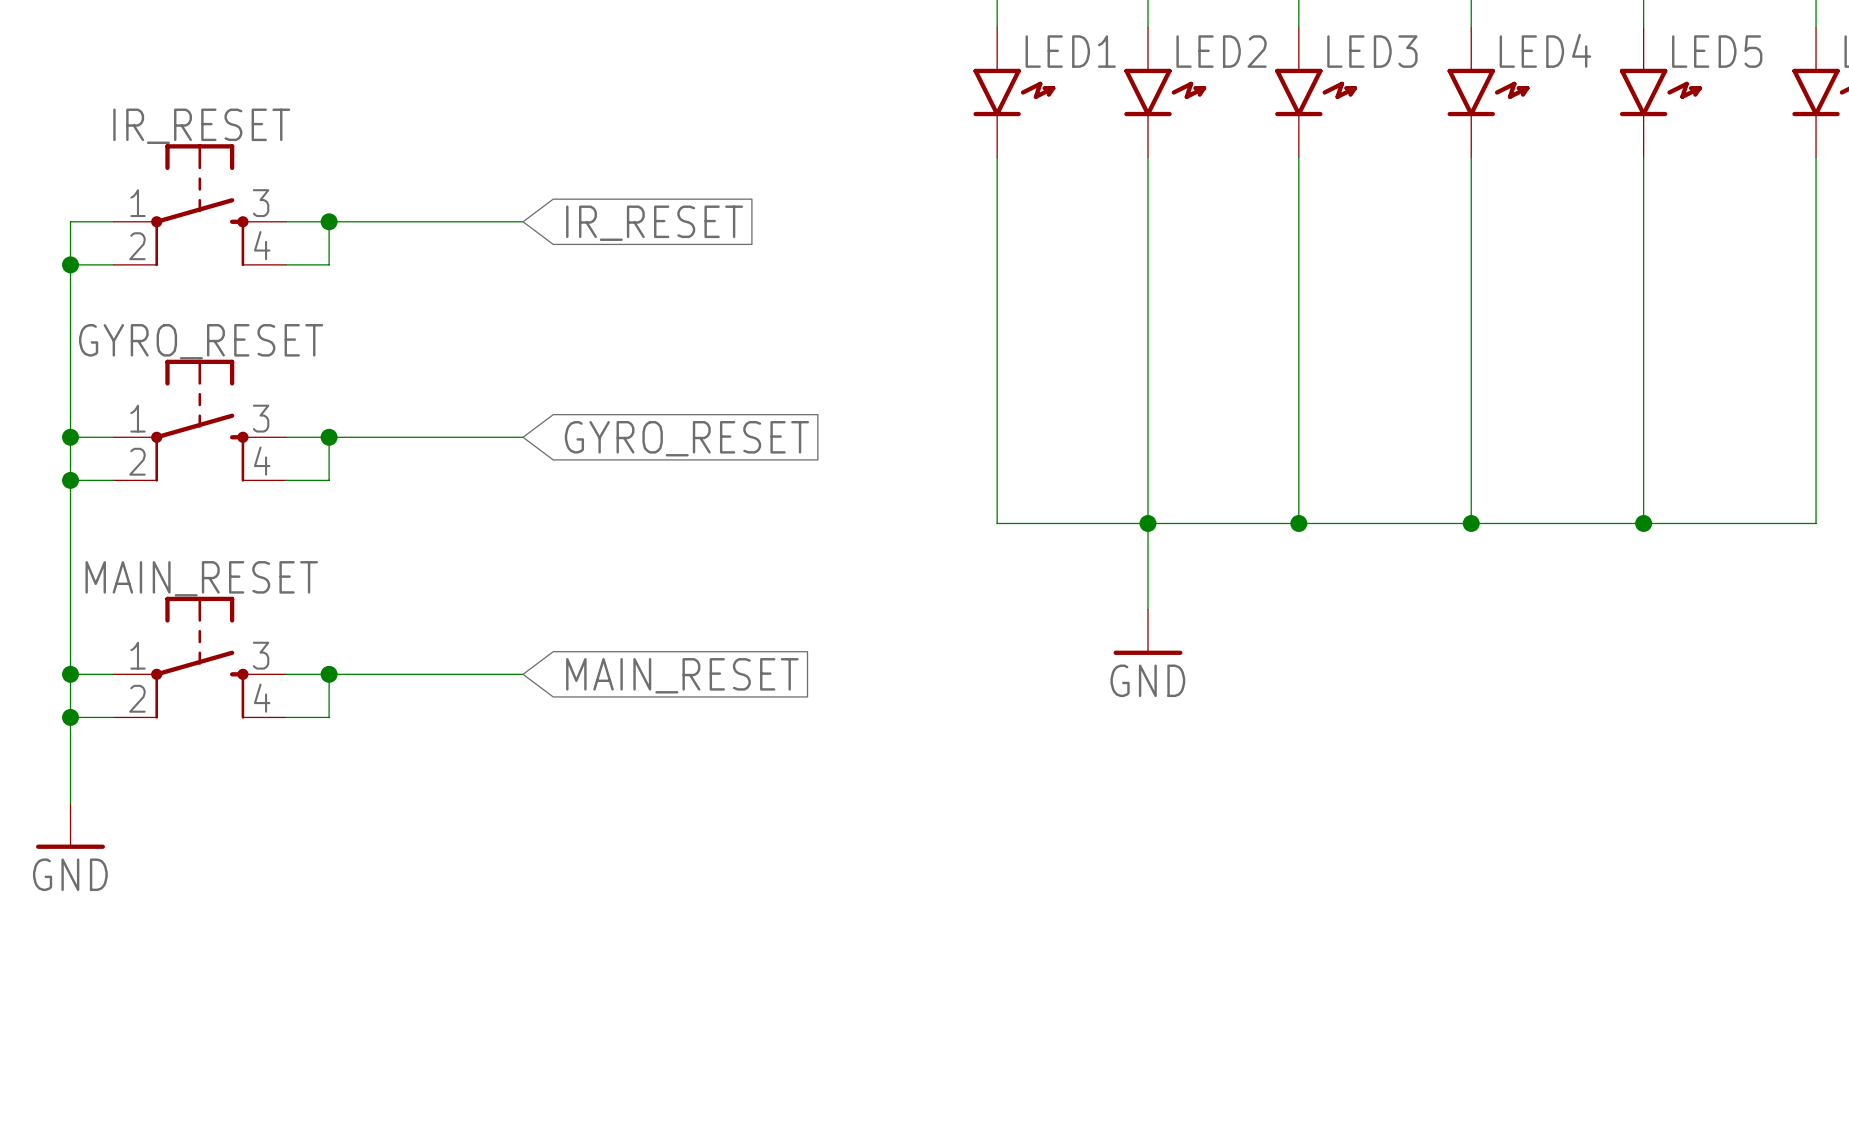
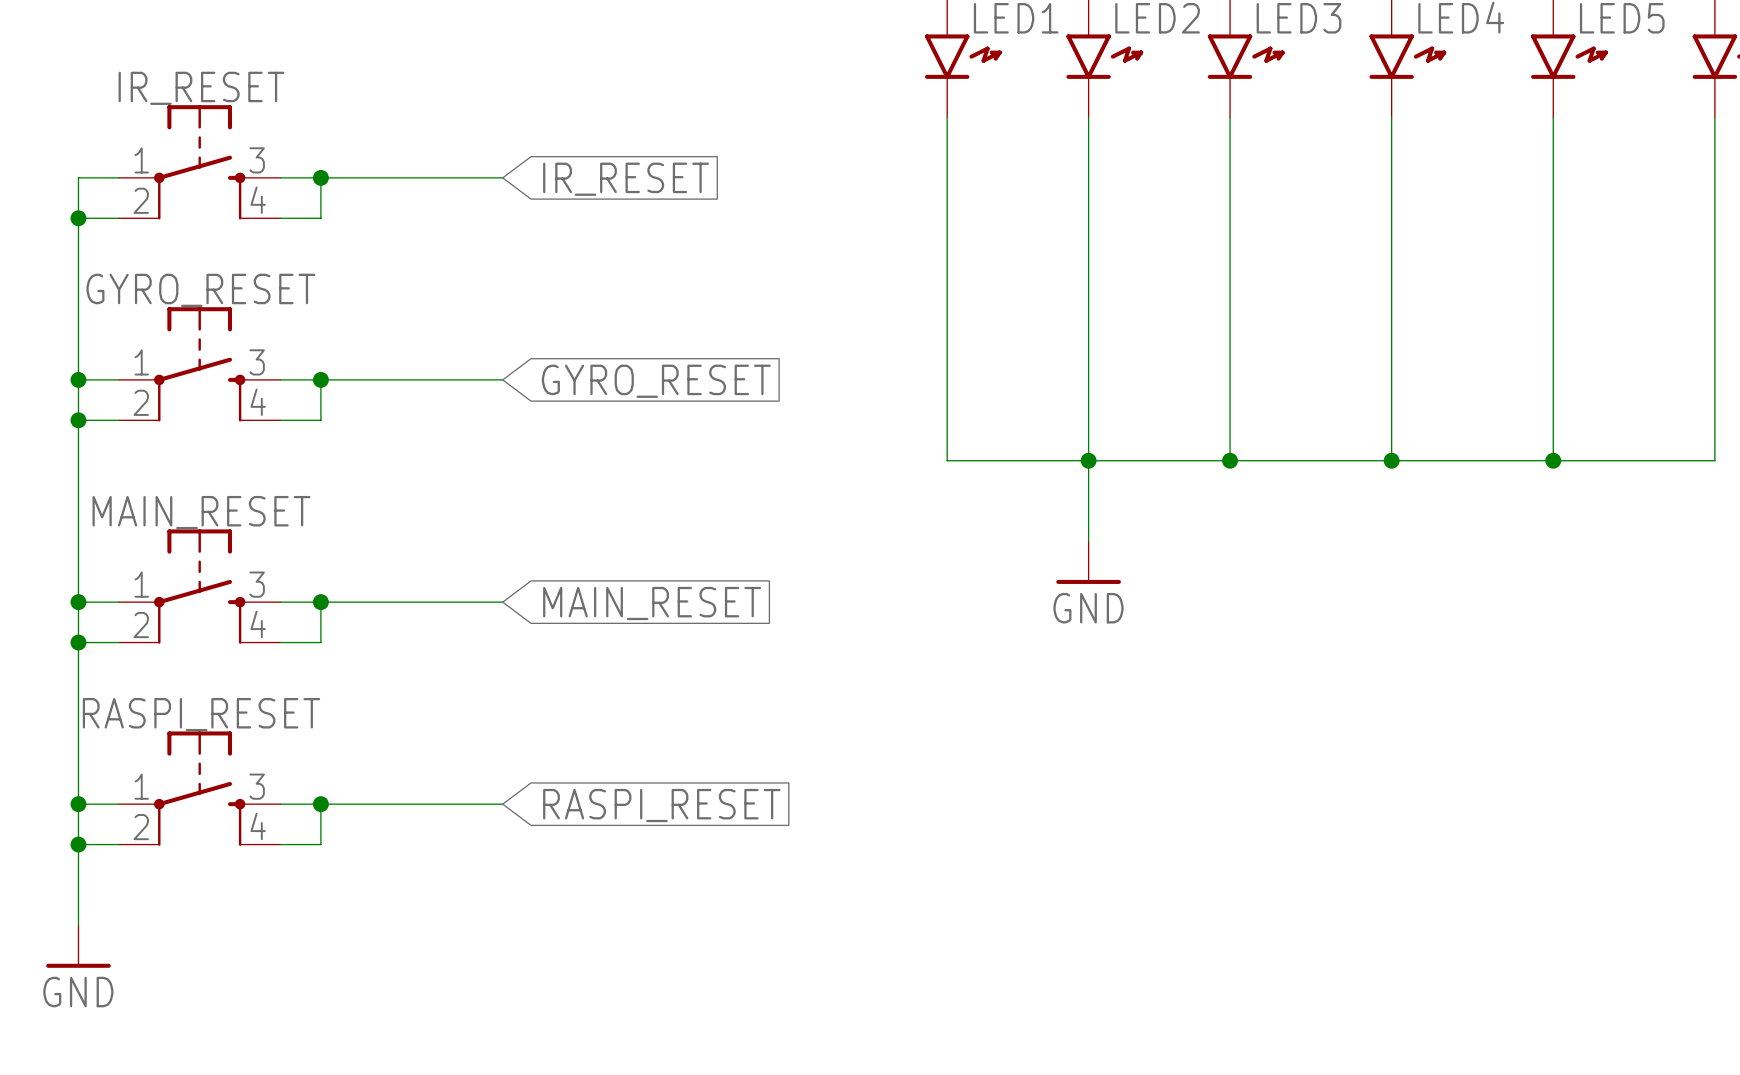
wire: none -> (78, 723) (78, 925)
power symbol position: GND (70, 826) -> GND (78, 946)
RASPI_RESET: none -> (199, 788)
wire: none -> (78, 804) (118, 804)
junction: none -> (78, 804)
wire: none -> (280, 804) (502, 804)
wire: none -> (320, 804) (320, 844) (280, 844)
junction: none -> (320, 804)
global label: none -> RASPI_RESET (661, 805)
wire: none -> (78, 844) (118, 844)
junction: none -> (78, 844)

